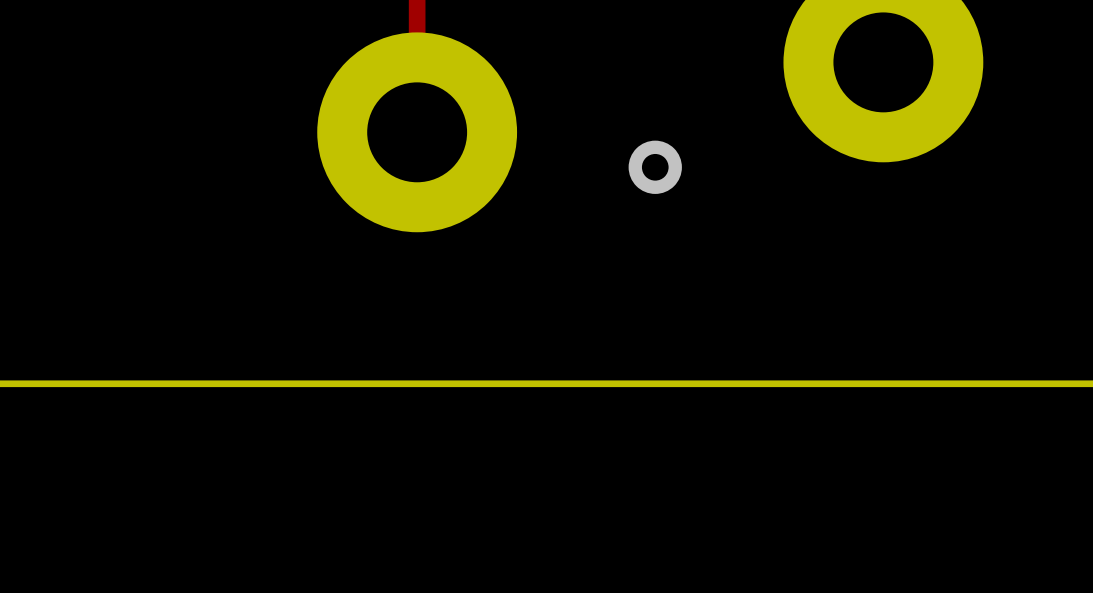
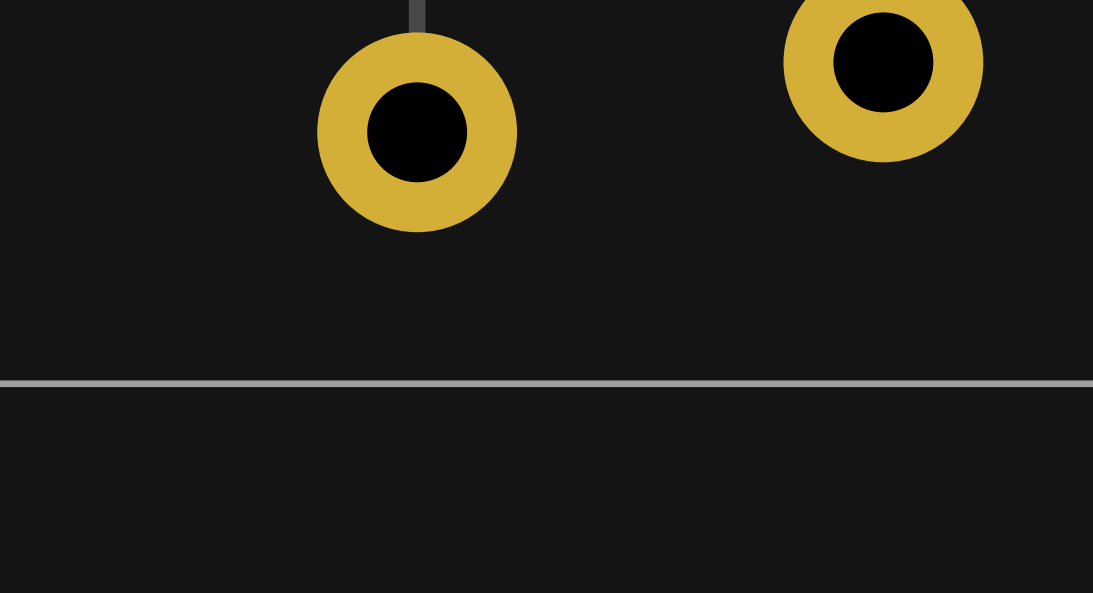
via: (655, 167) -> none

